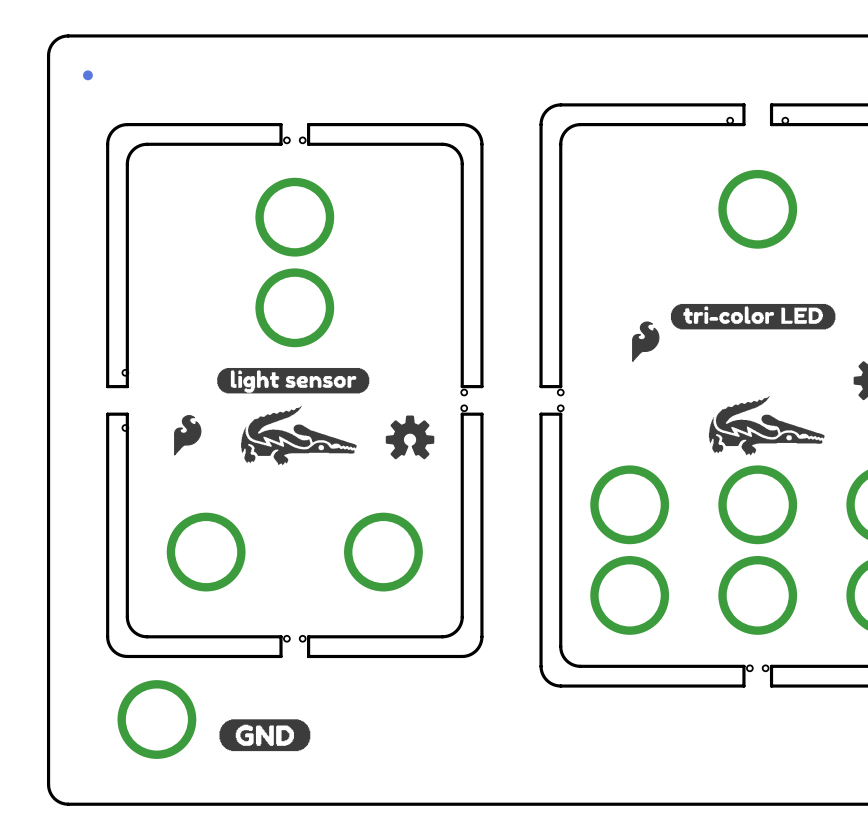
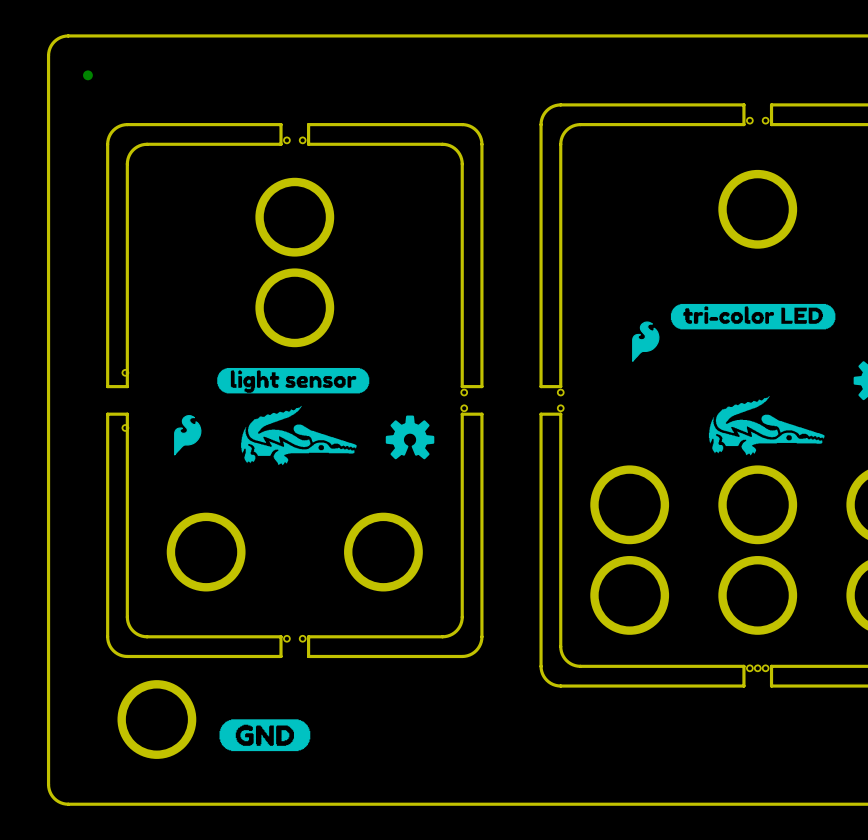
hole: (730, 120) -> none
hole: none -> (749, 120)
hole: none -> (765, 120)
hole: (785, 120) -> none
hole: none -> (757, 668)

